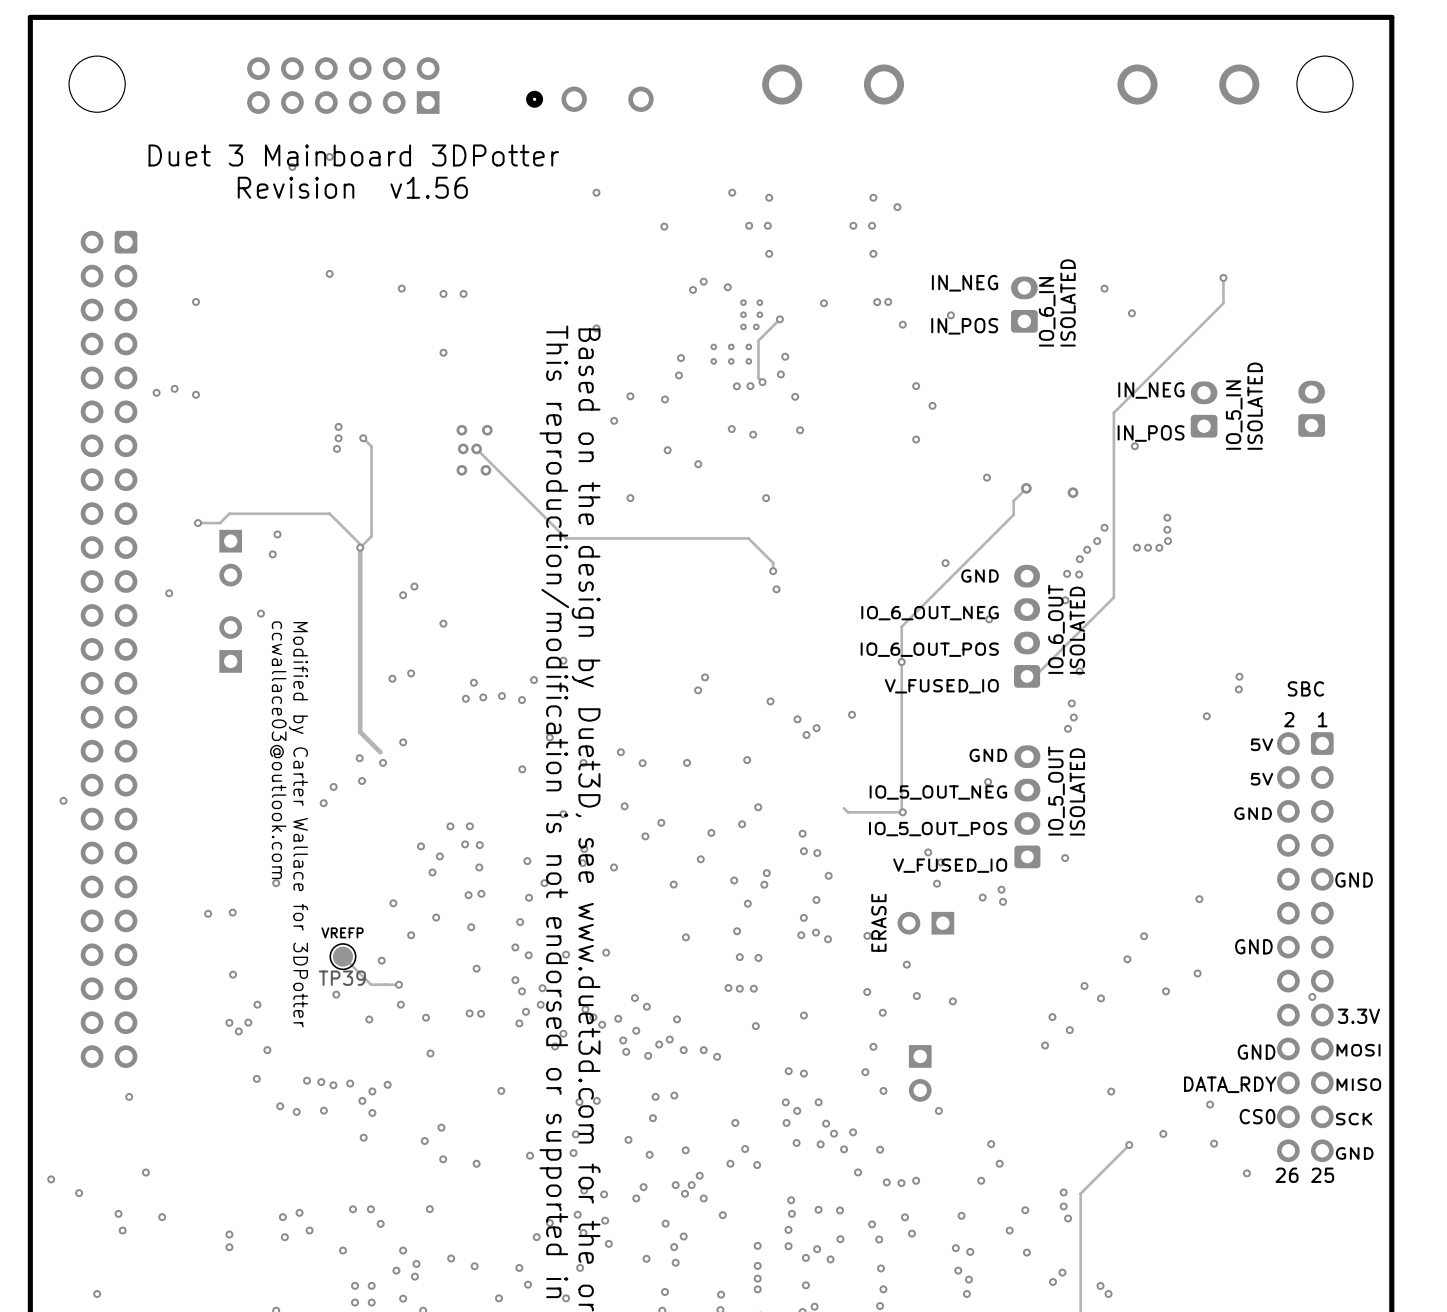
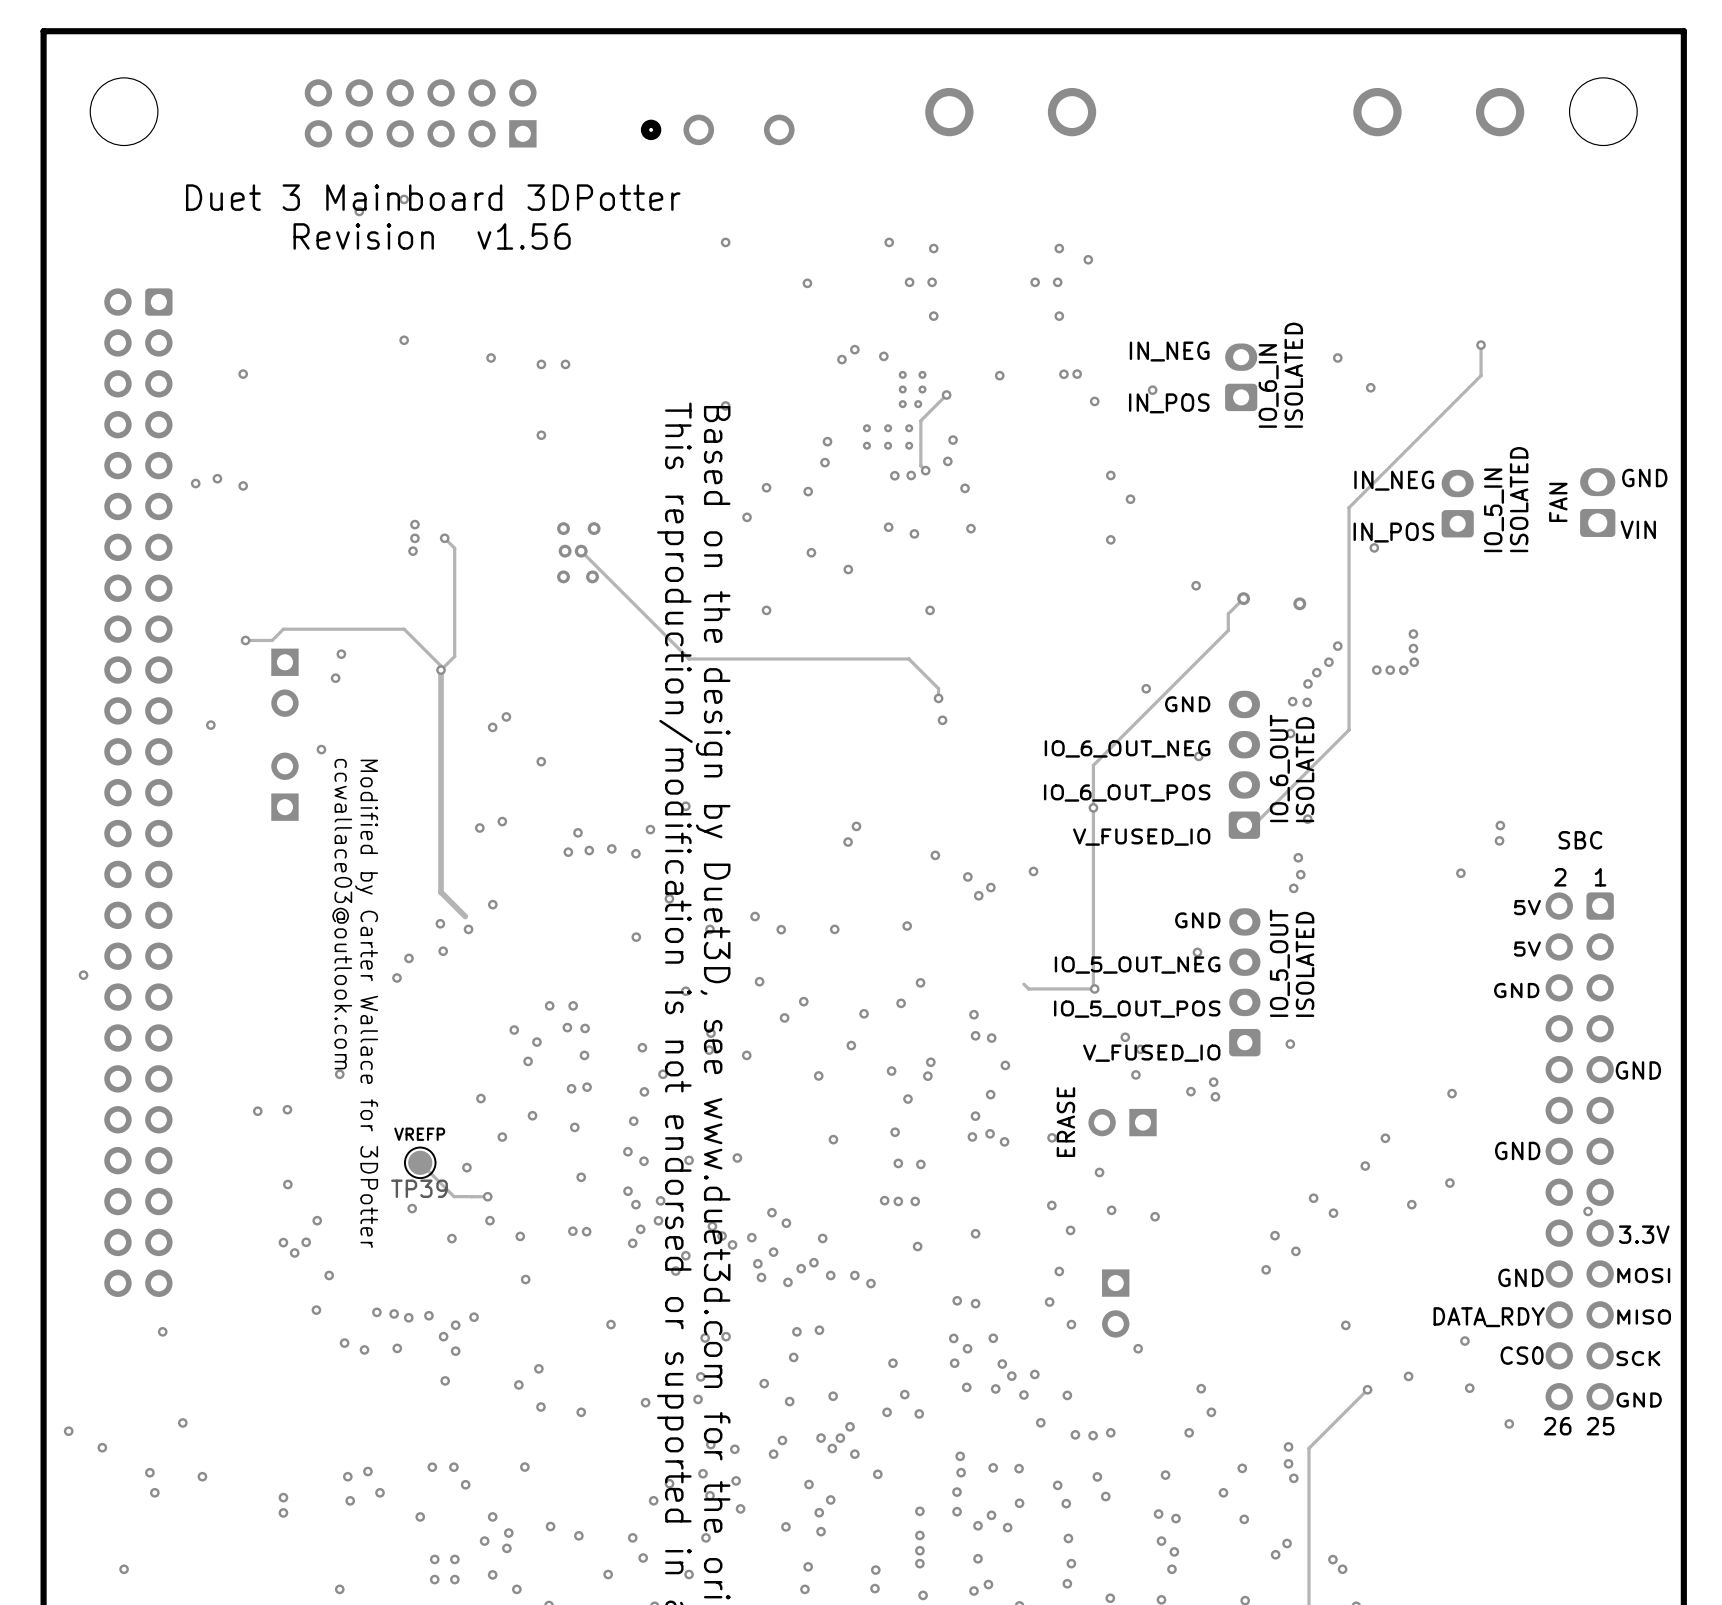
part footprint: [1298, 380, 1326, 437] -> [1580, 468, 1616, 537]
text: none -> GND (1644, 478)
text: none -> FAN (1558, 502)
text: none -> VIN (1638, 529)

